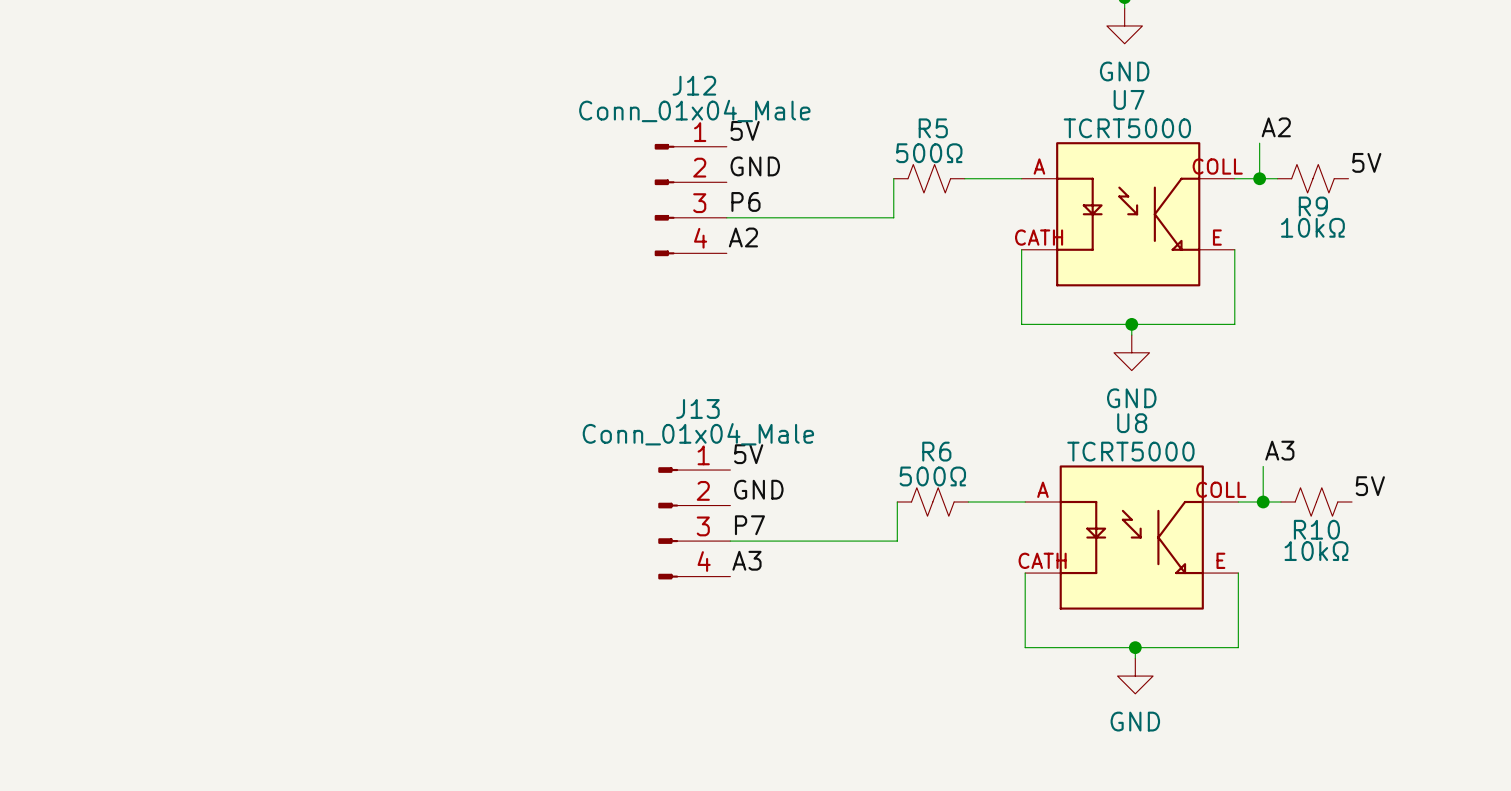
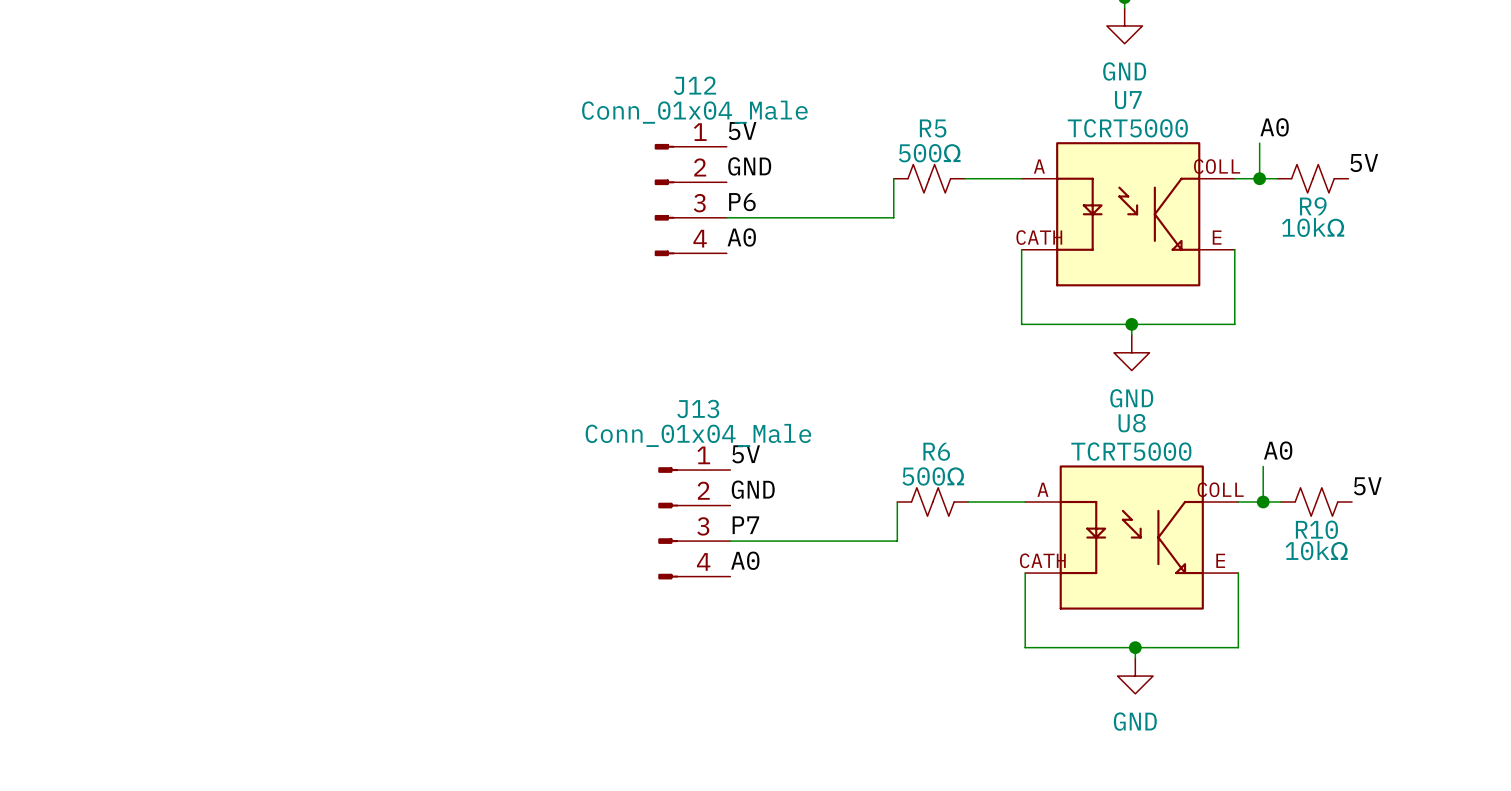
label: A2 (1276, 127) -> A0 (1274, 127)
label: A2 (743, 237) -> A0 (741, 237)
label: A3 (1279, 450) -> A0 (1278, 450)
label: A3 (746, 560) -> A0 (745, 560)

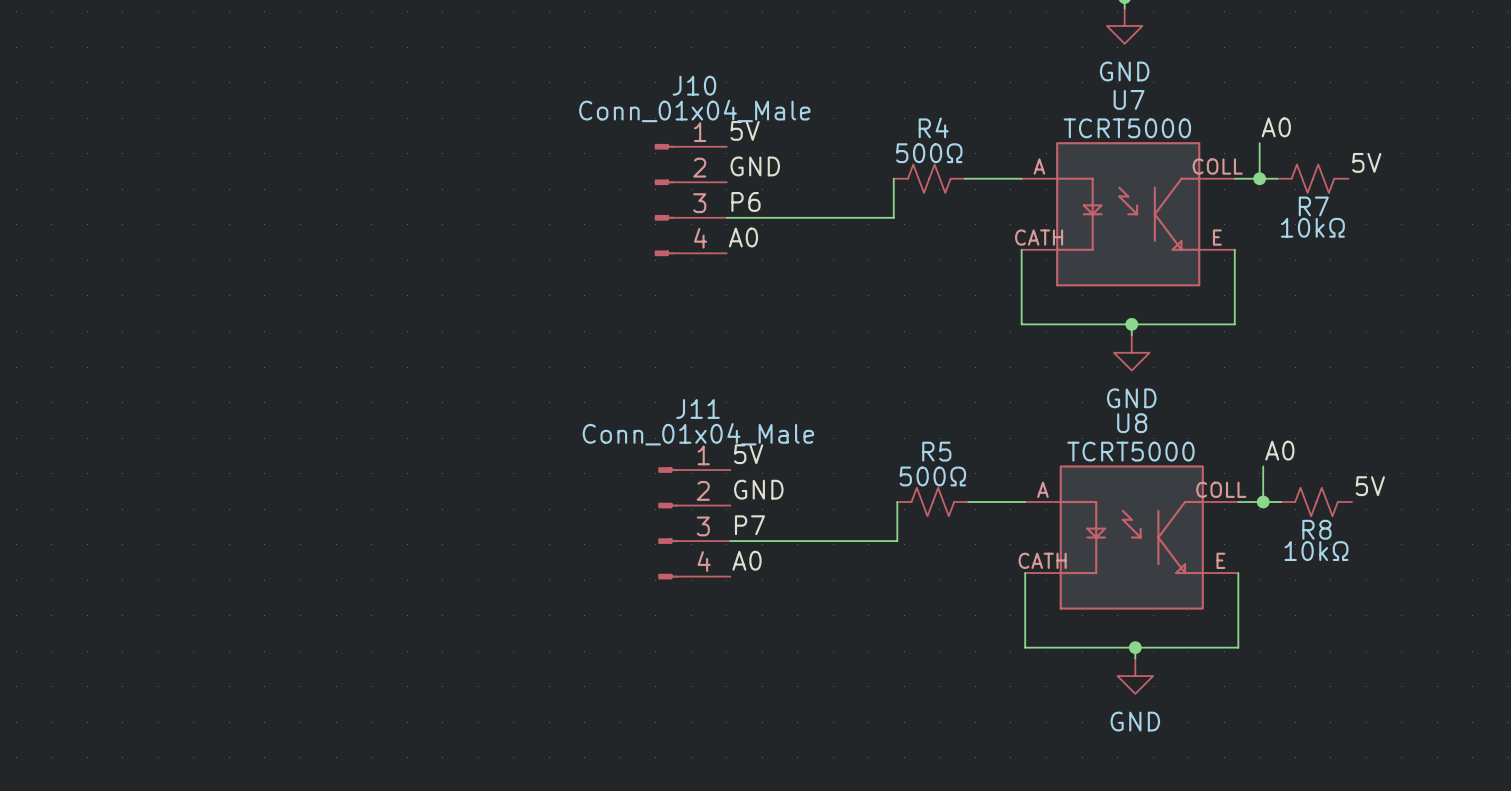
J12 name: J12 (694, 85) -> J10 (694, 85)
R5 name: R5 (933, 128) -> R4 (933, 127)
R9 name: R9 (1313, 206) -> R7 (1313, 206)
J13 name: J13 (698, 408) -> J11 (697, 408)
R6 name: R6 (936, 451) -> R5 (936, 451)
R10 name: R10 (1316, 529) -> R8 (1316, 529)

